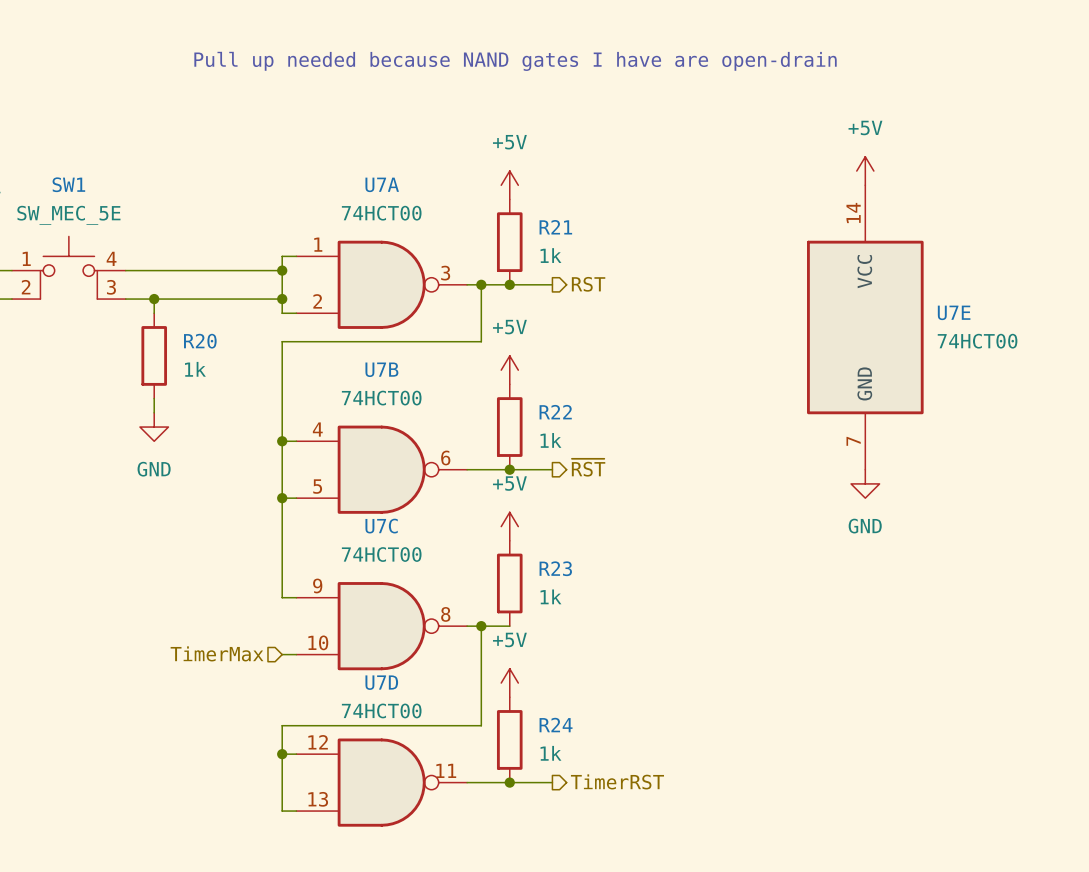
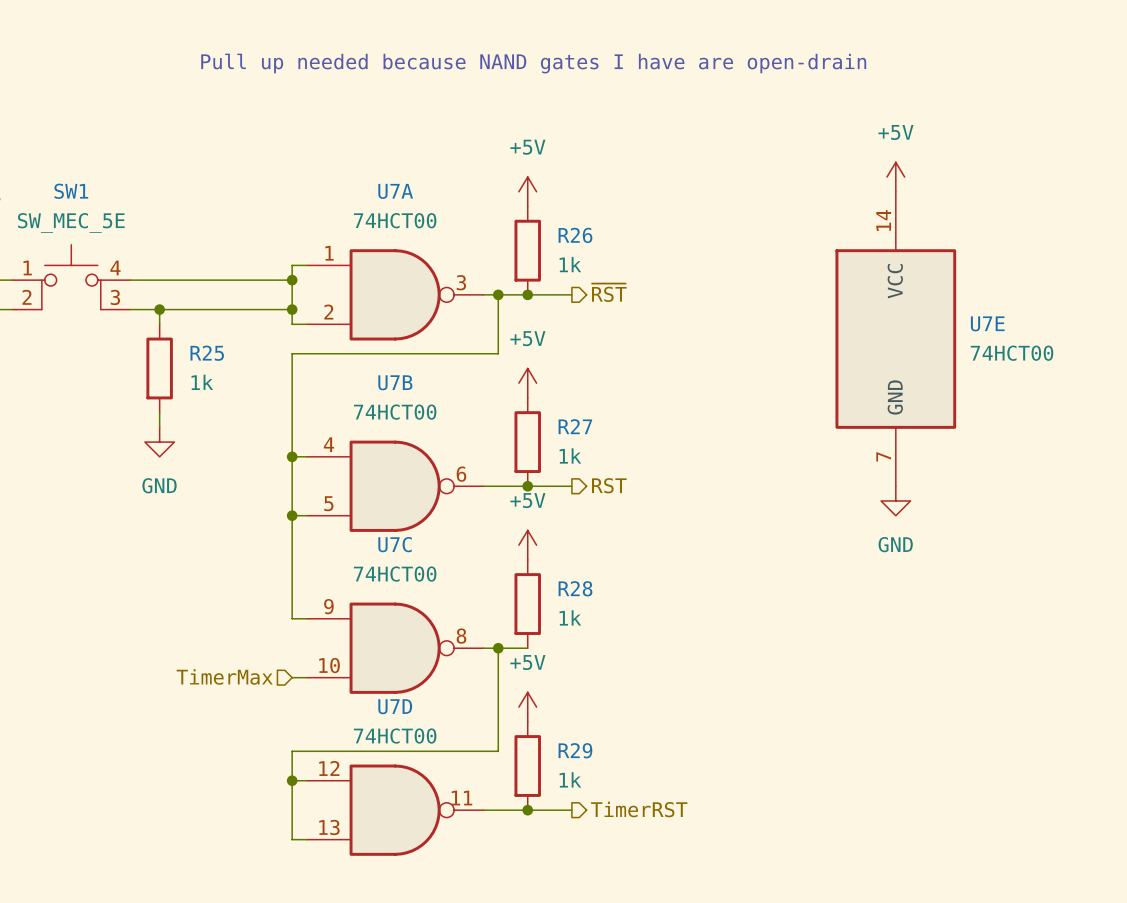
R21 name: R21 (555, 227) -> R26 (575, 235)
hierarchical label: RST (588, 284) -> ~{RST} (609, 292)
R20 name: R20 (200, 341) -> R25 (207, 353)
R22 name: R22 (555, 412) -> R27 (575, 426)
hierarchical label: ~{RST} (588, 467) -> RST (609, 485)
R23 name: R23 (555, 568) -> R28 (575, 588)
R24 name: R24 (556, 725) -> R29 (575, 750)

